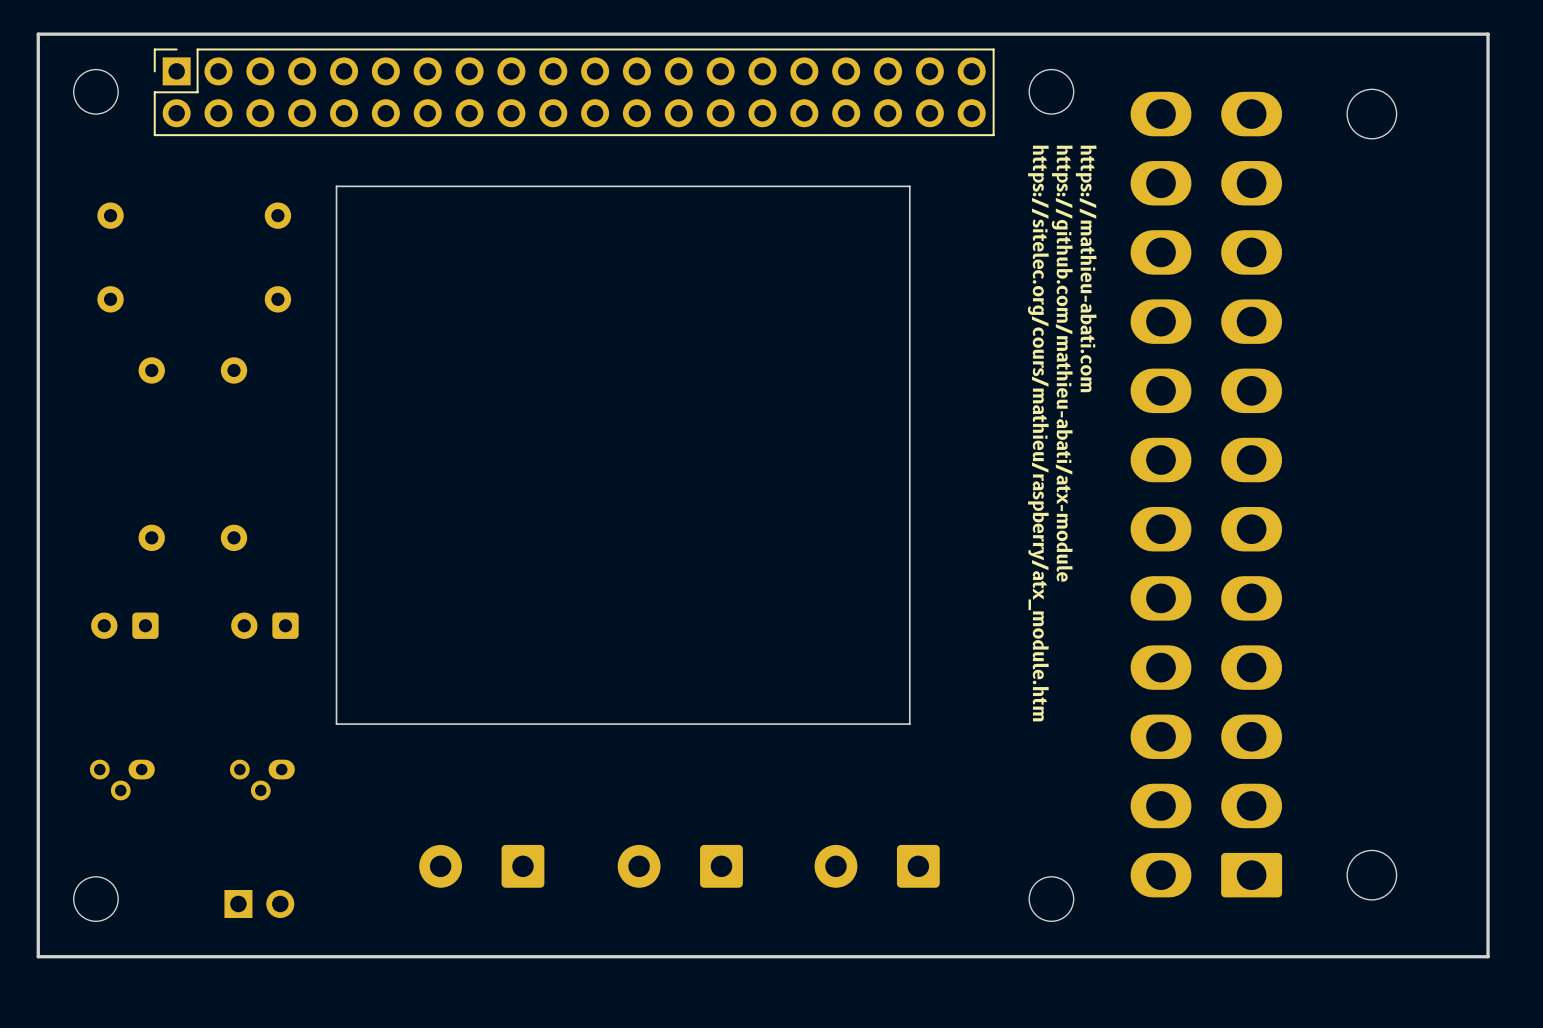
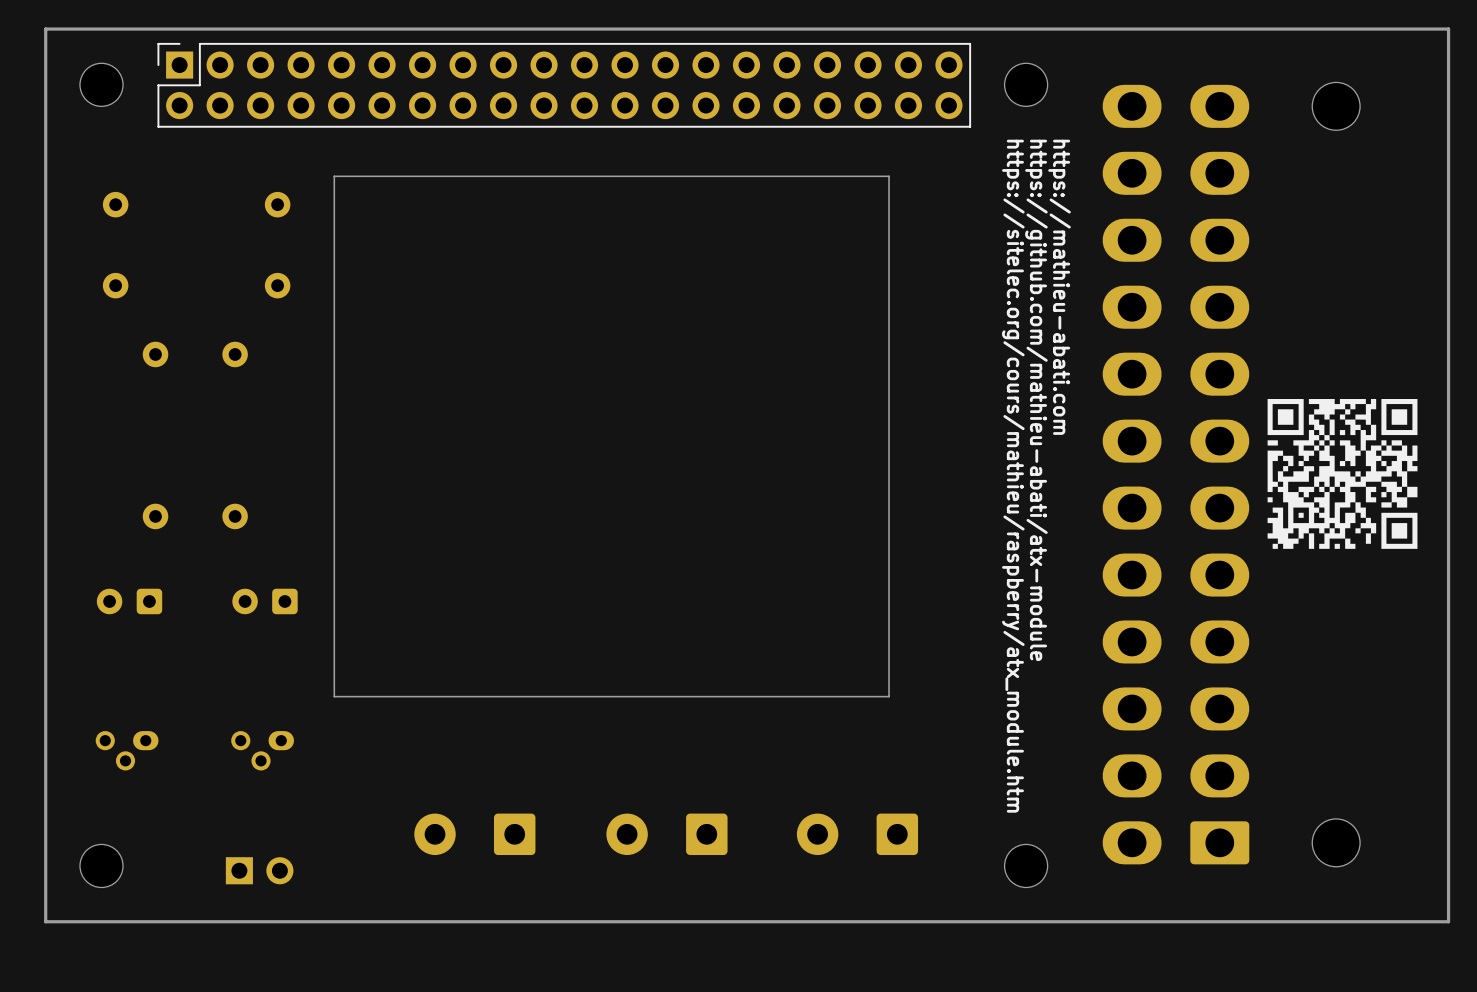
drawing: none -> [1267, 399, 1418, 549]

